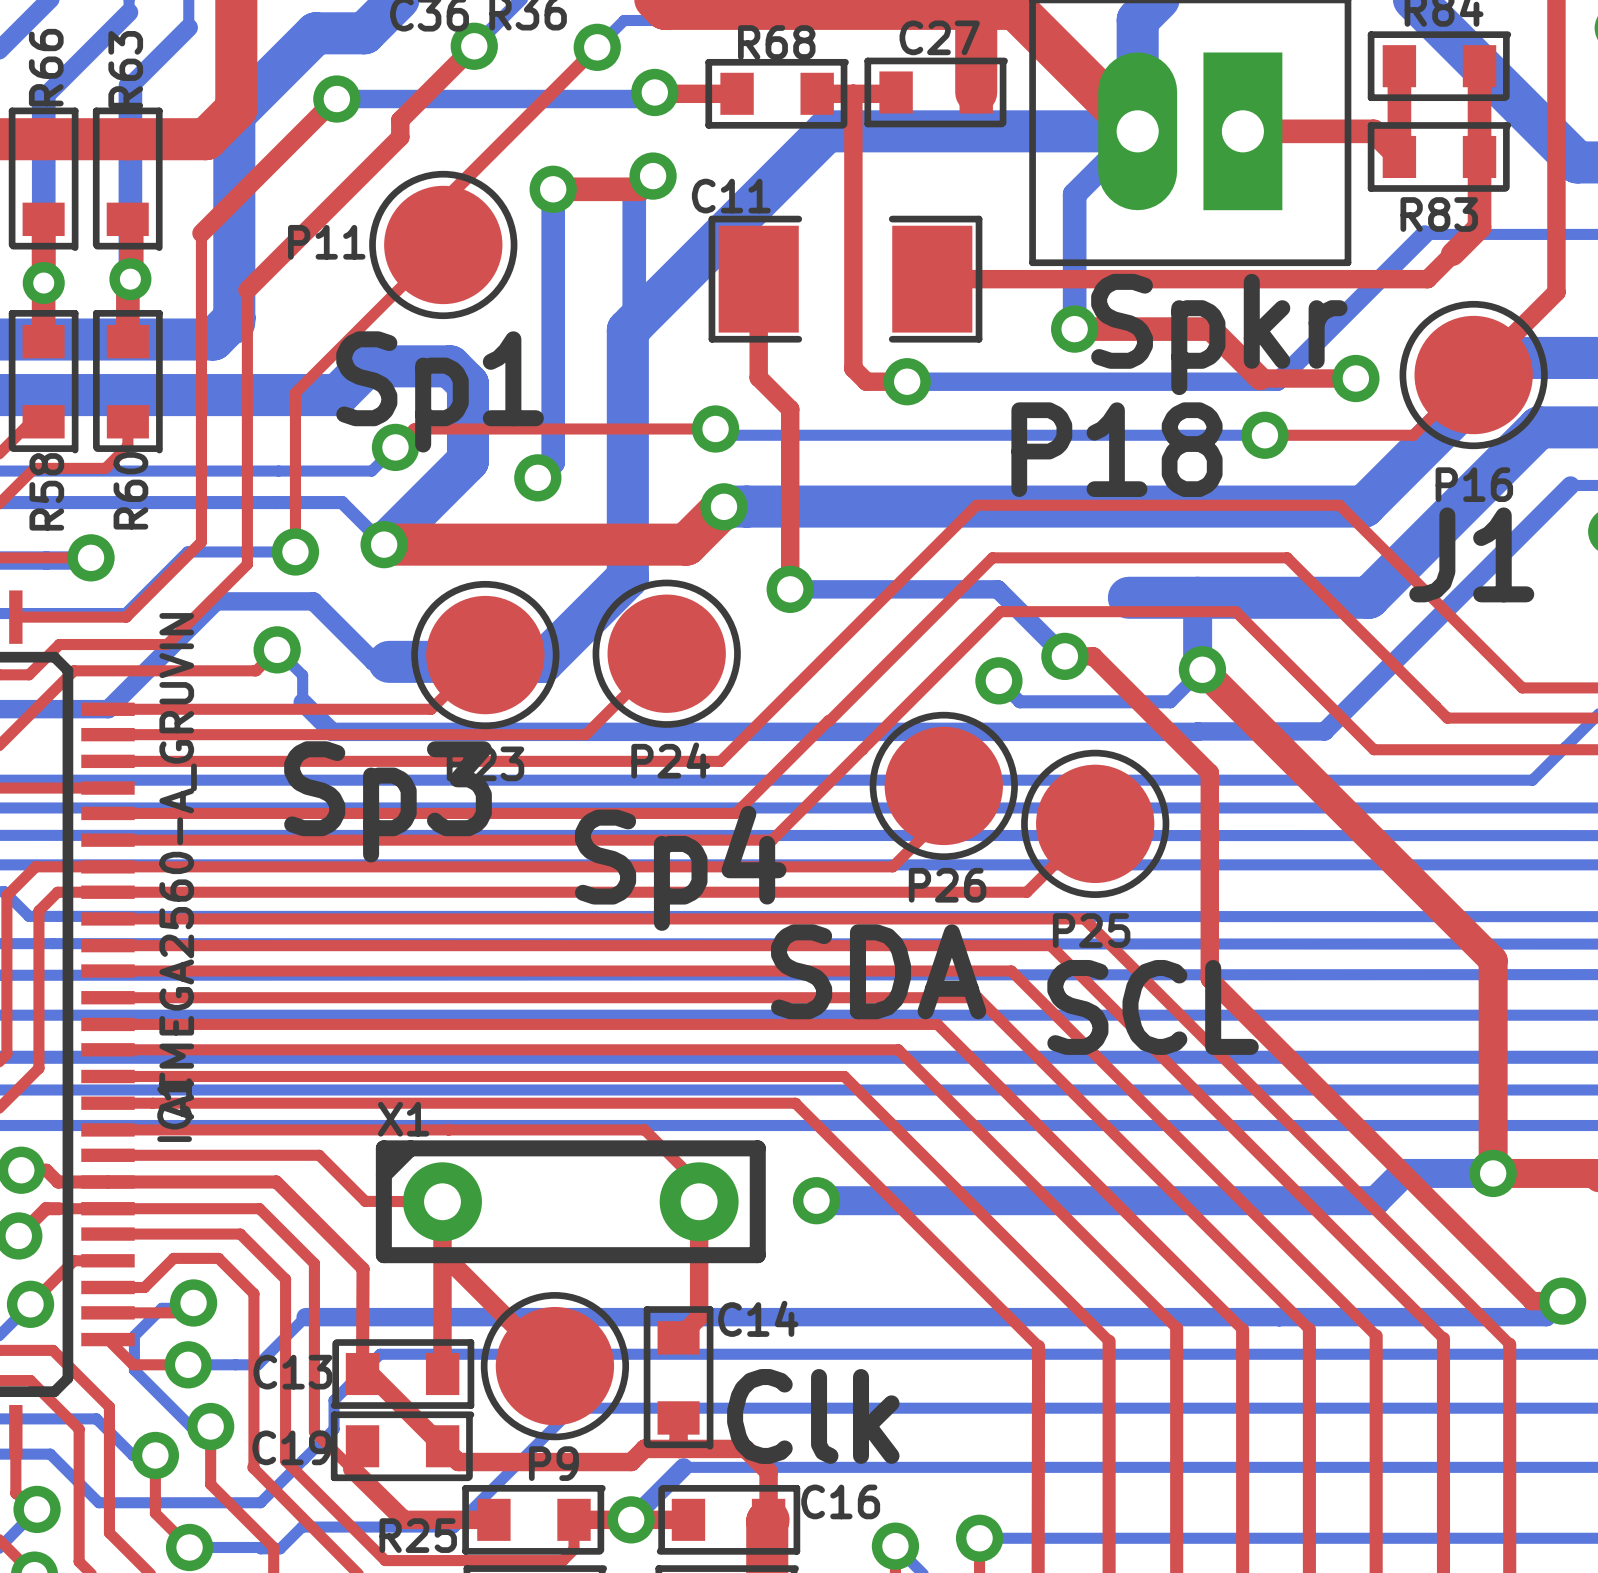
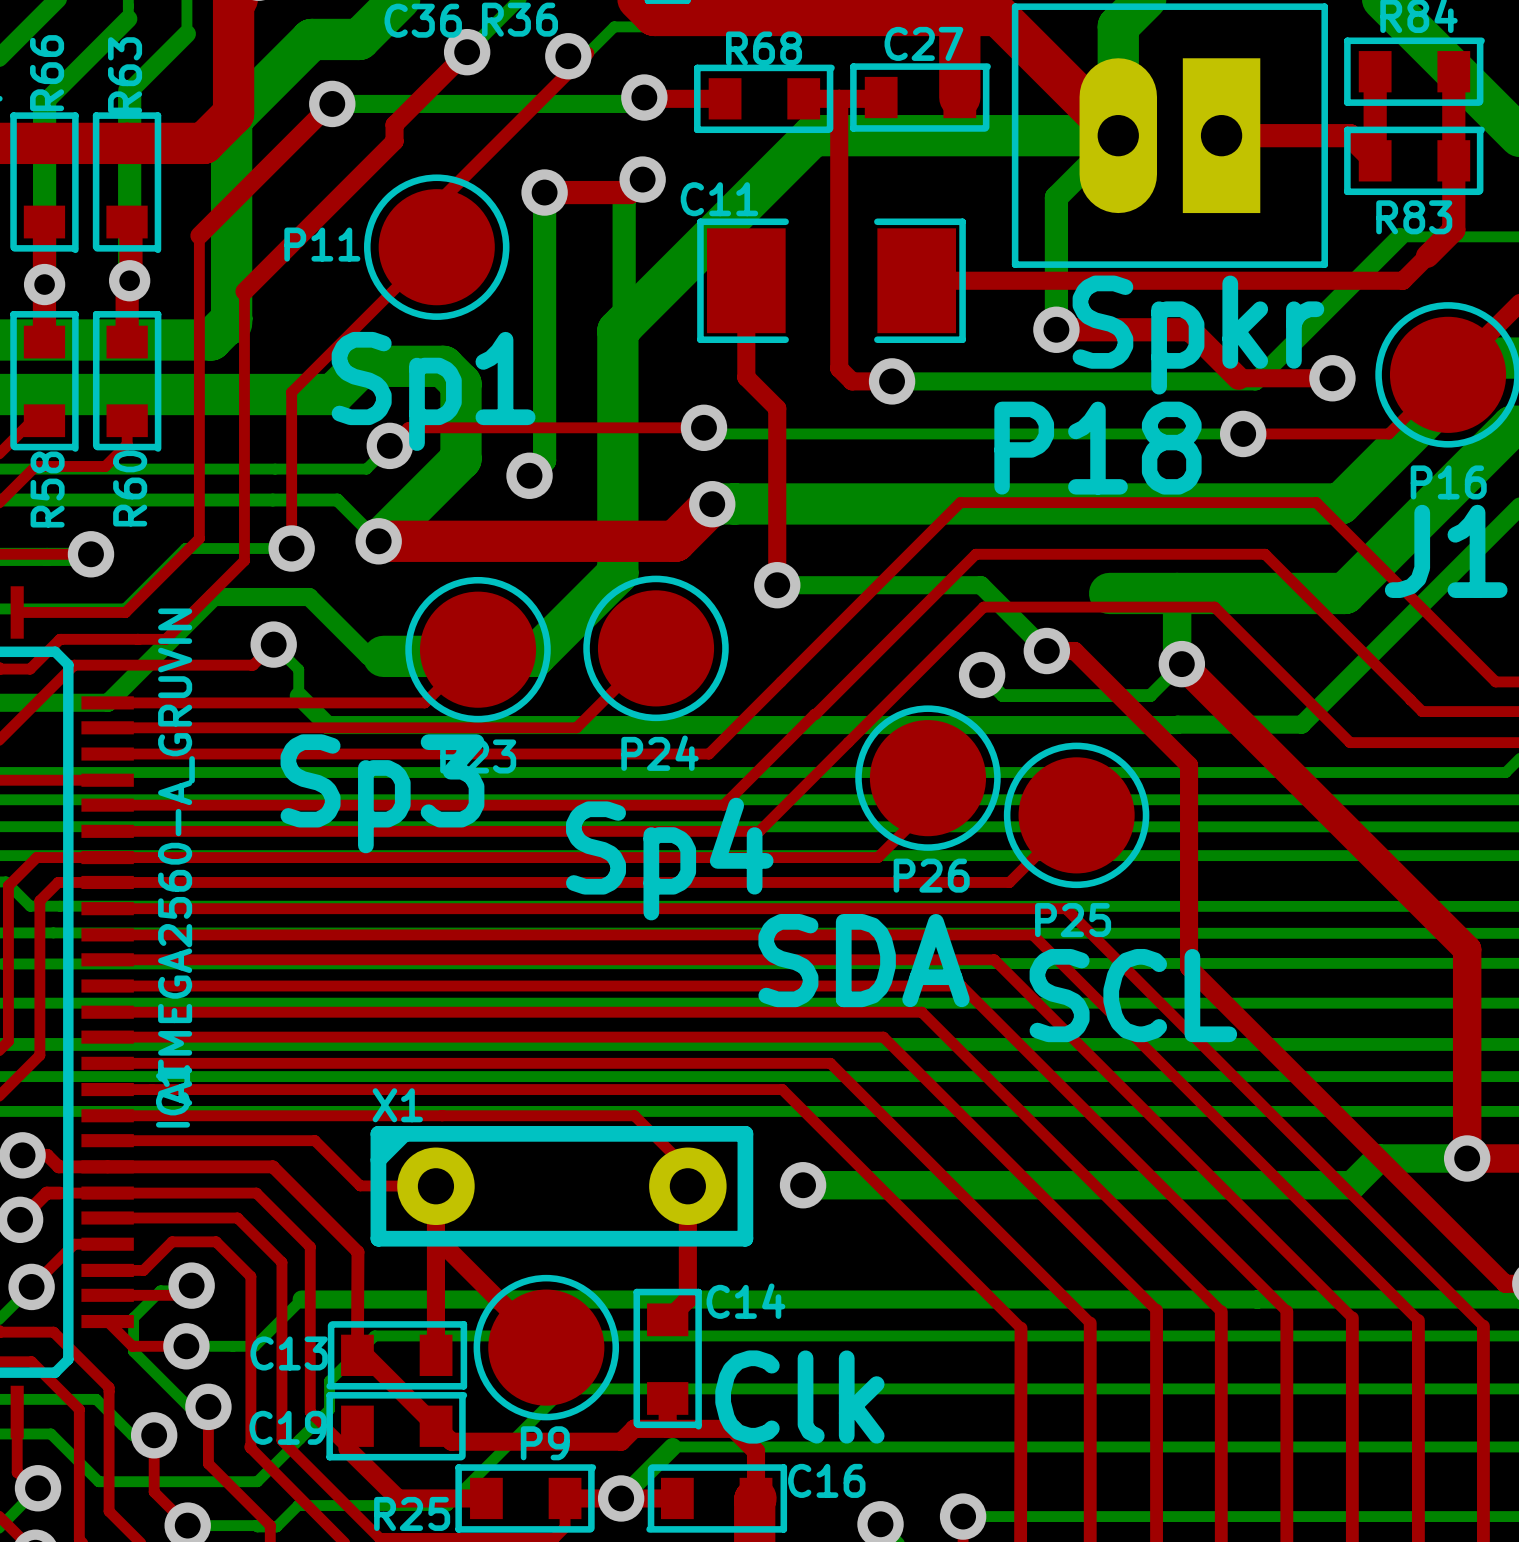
via position: (597, 47) -> (568, 56)

